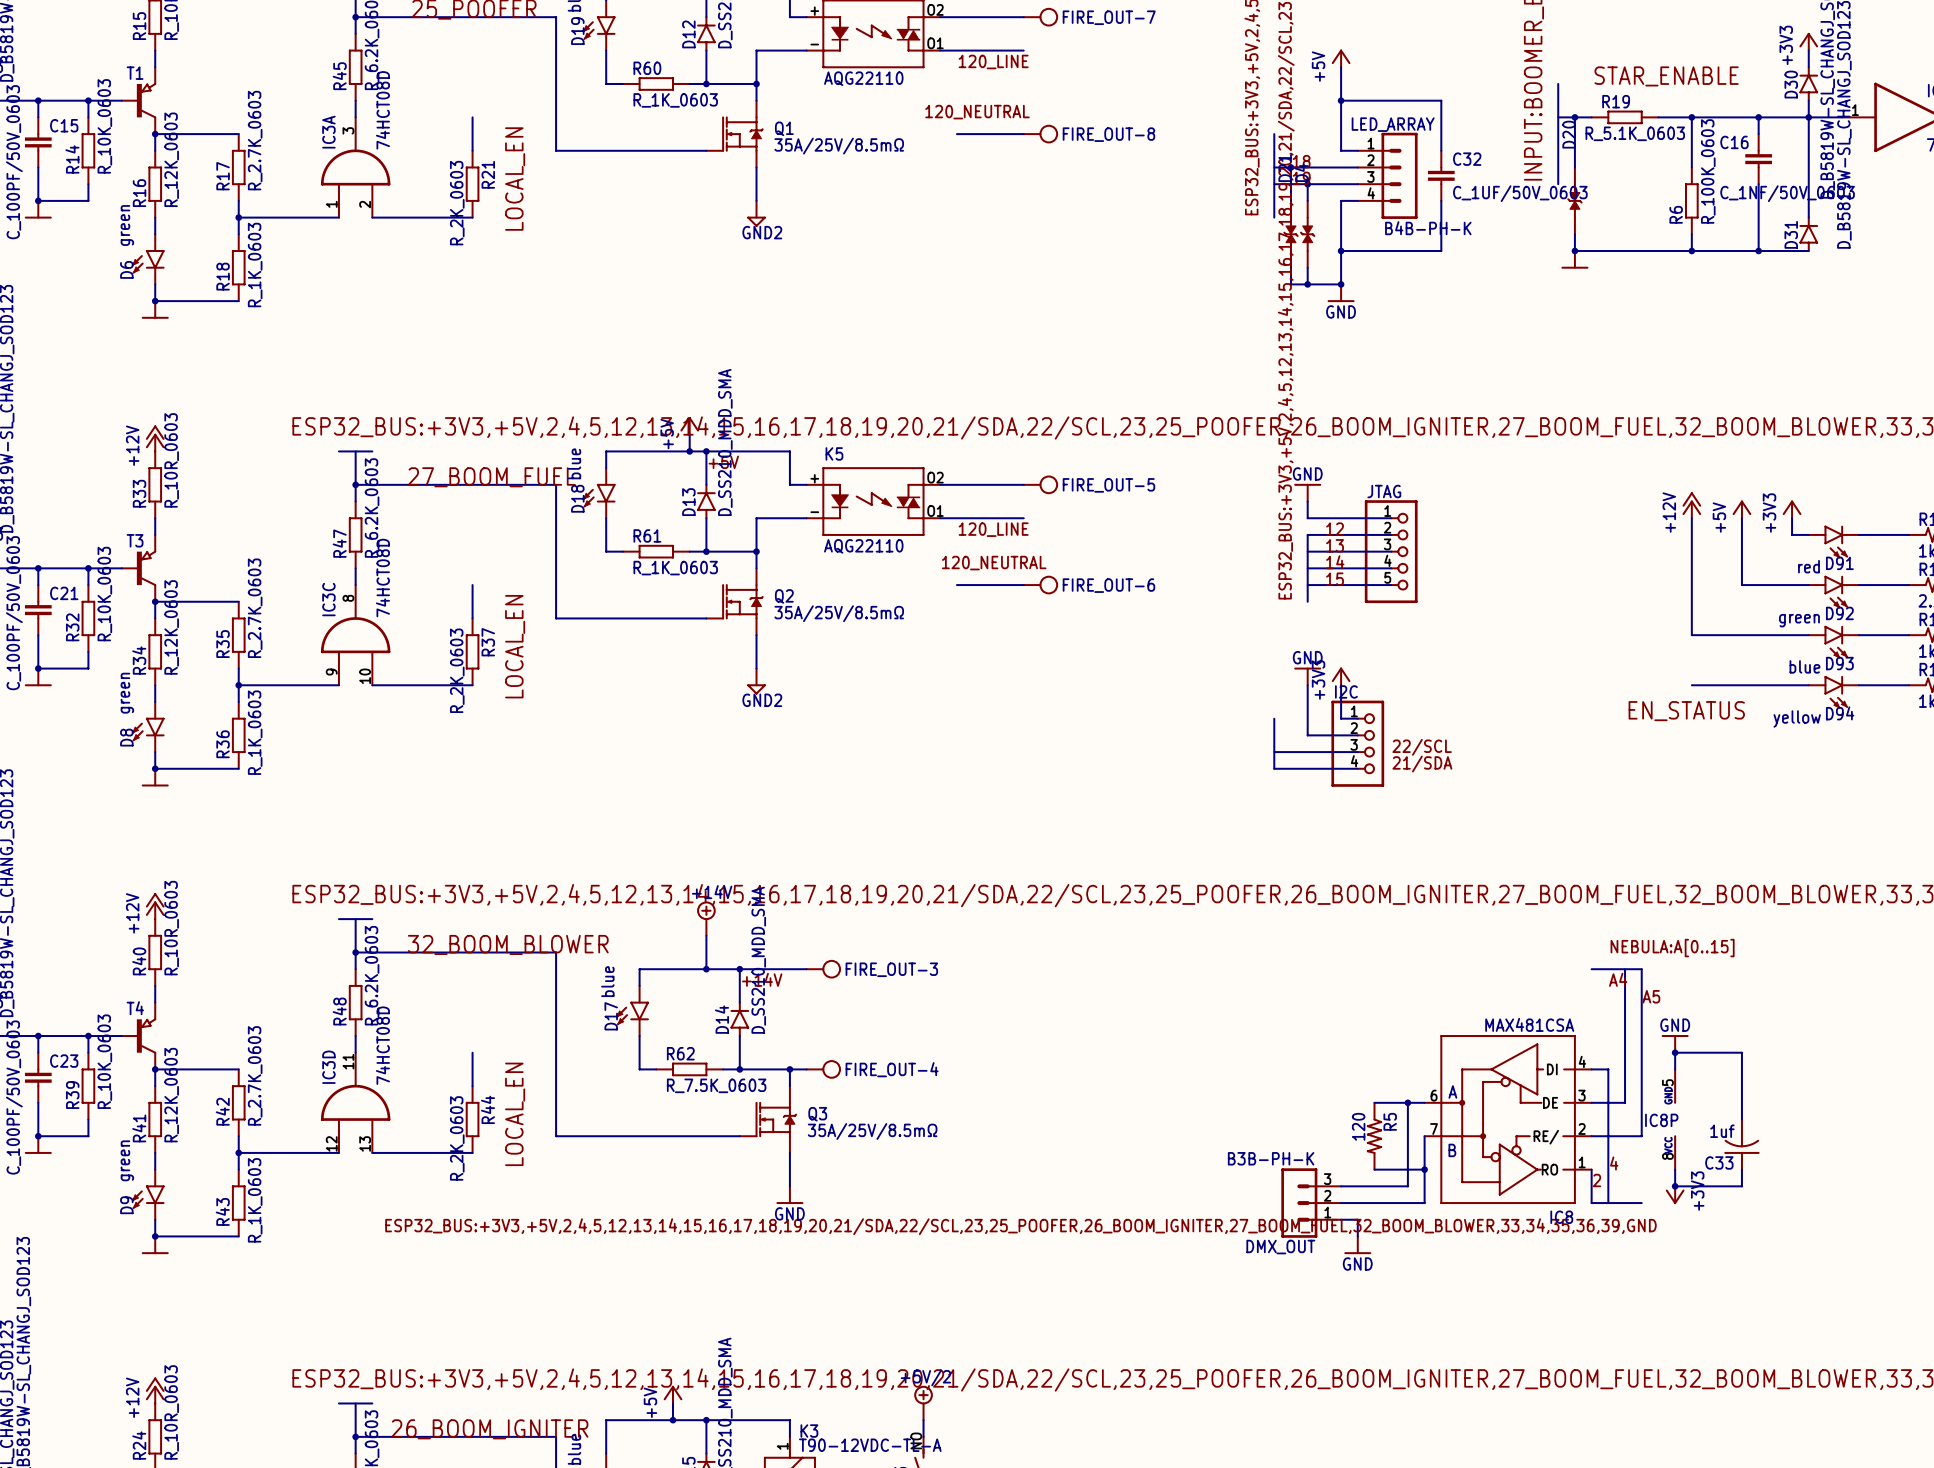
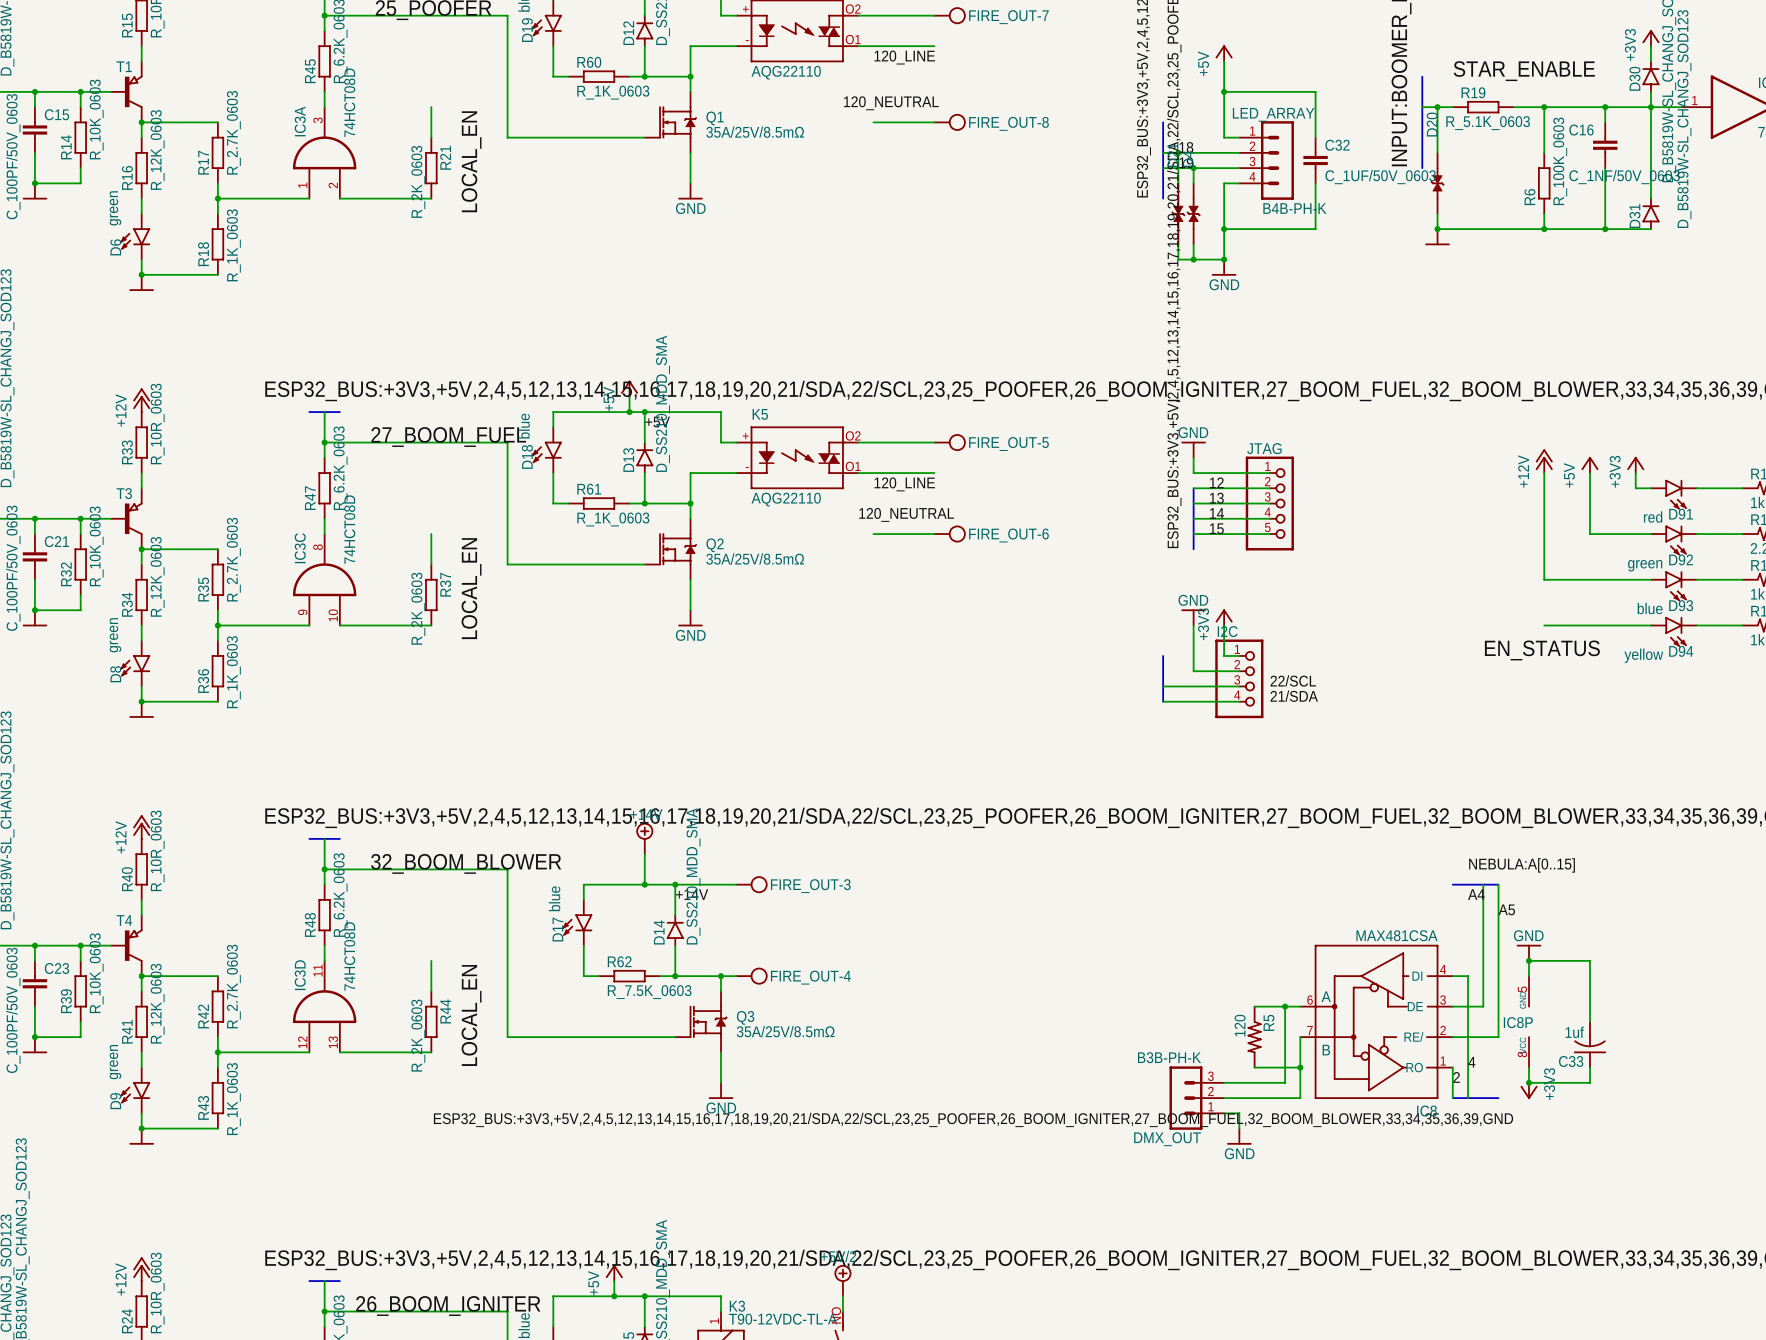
power symbol: GND2 (756, 213) -> GND (690, 191)
power symbol: GND2 (756, 681) -> GND (690, 618)

